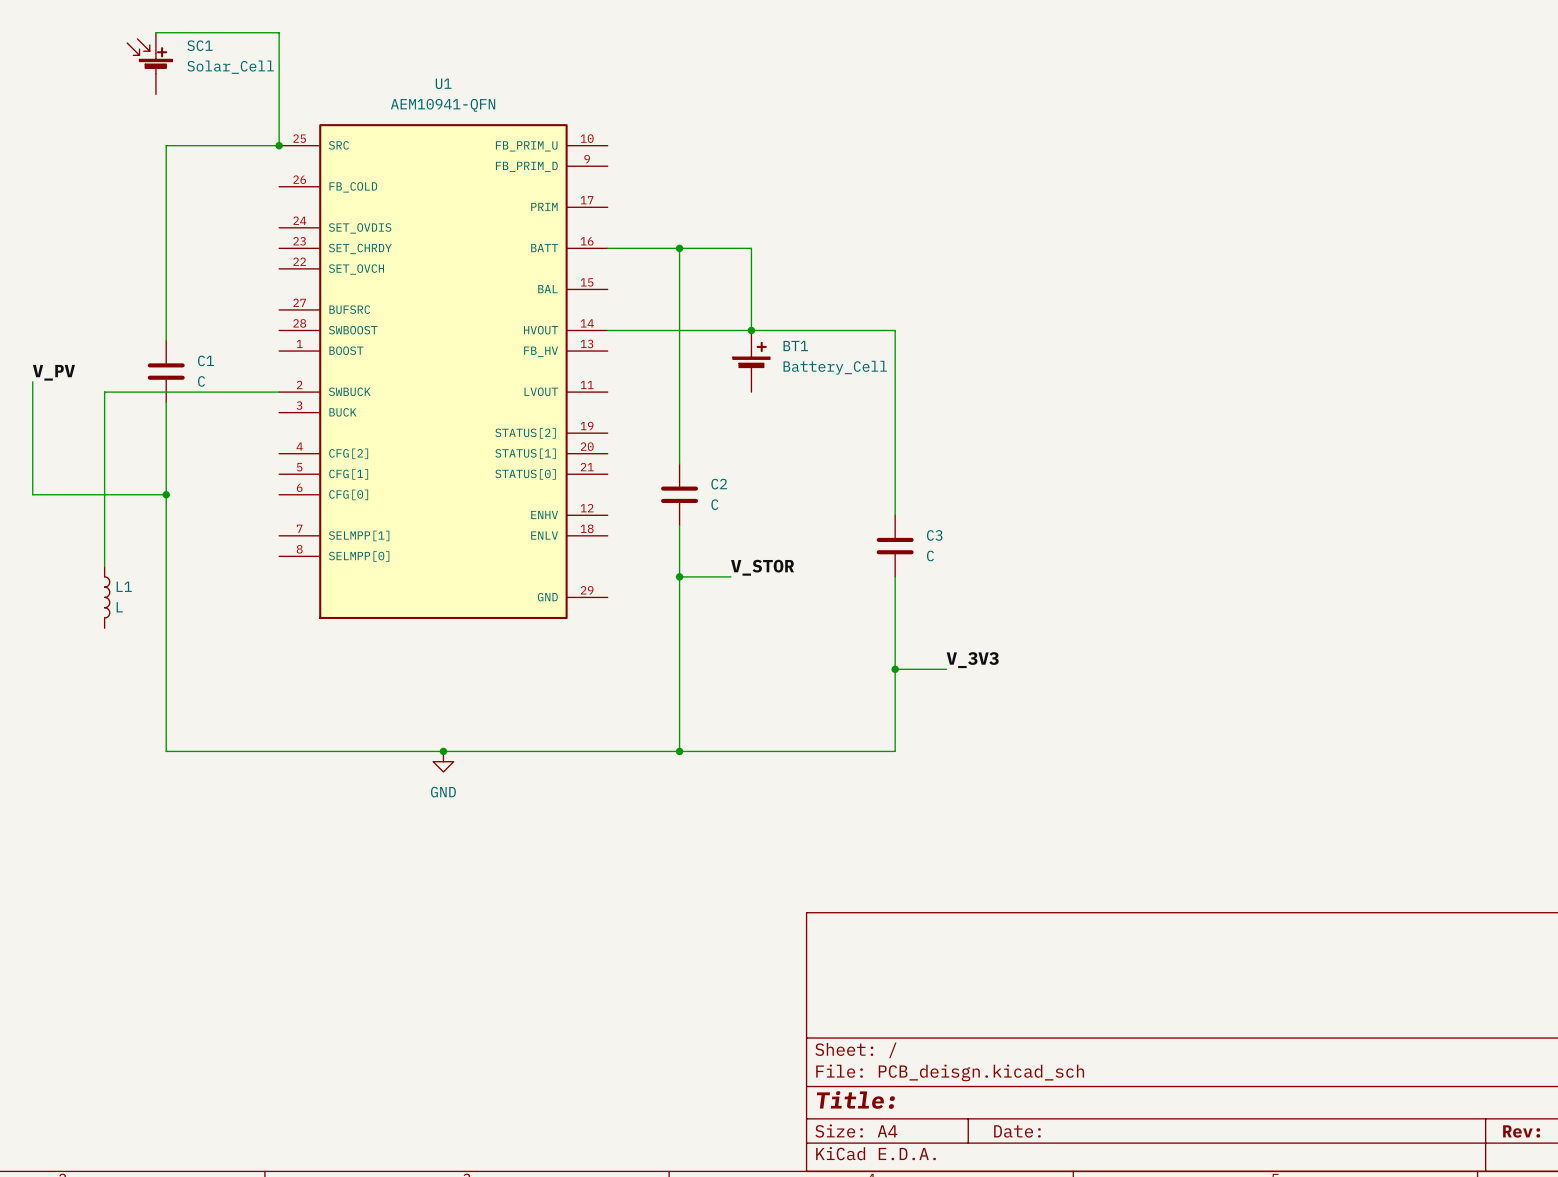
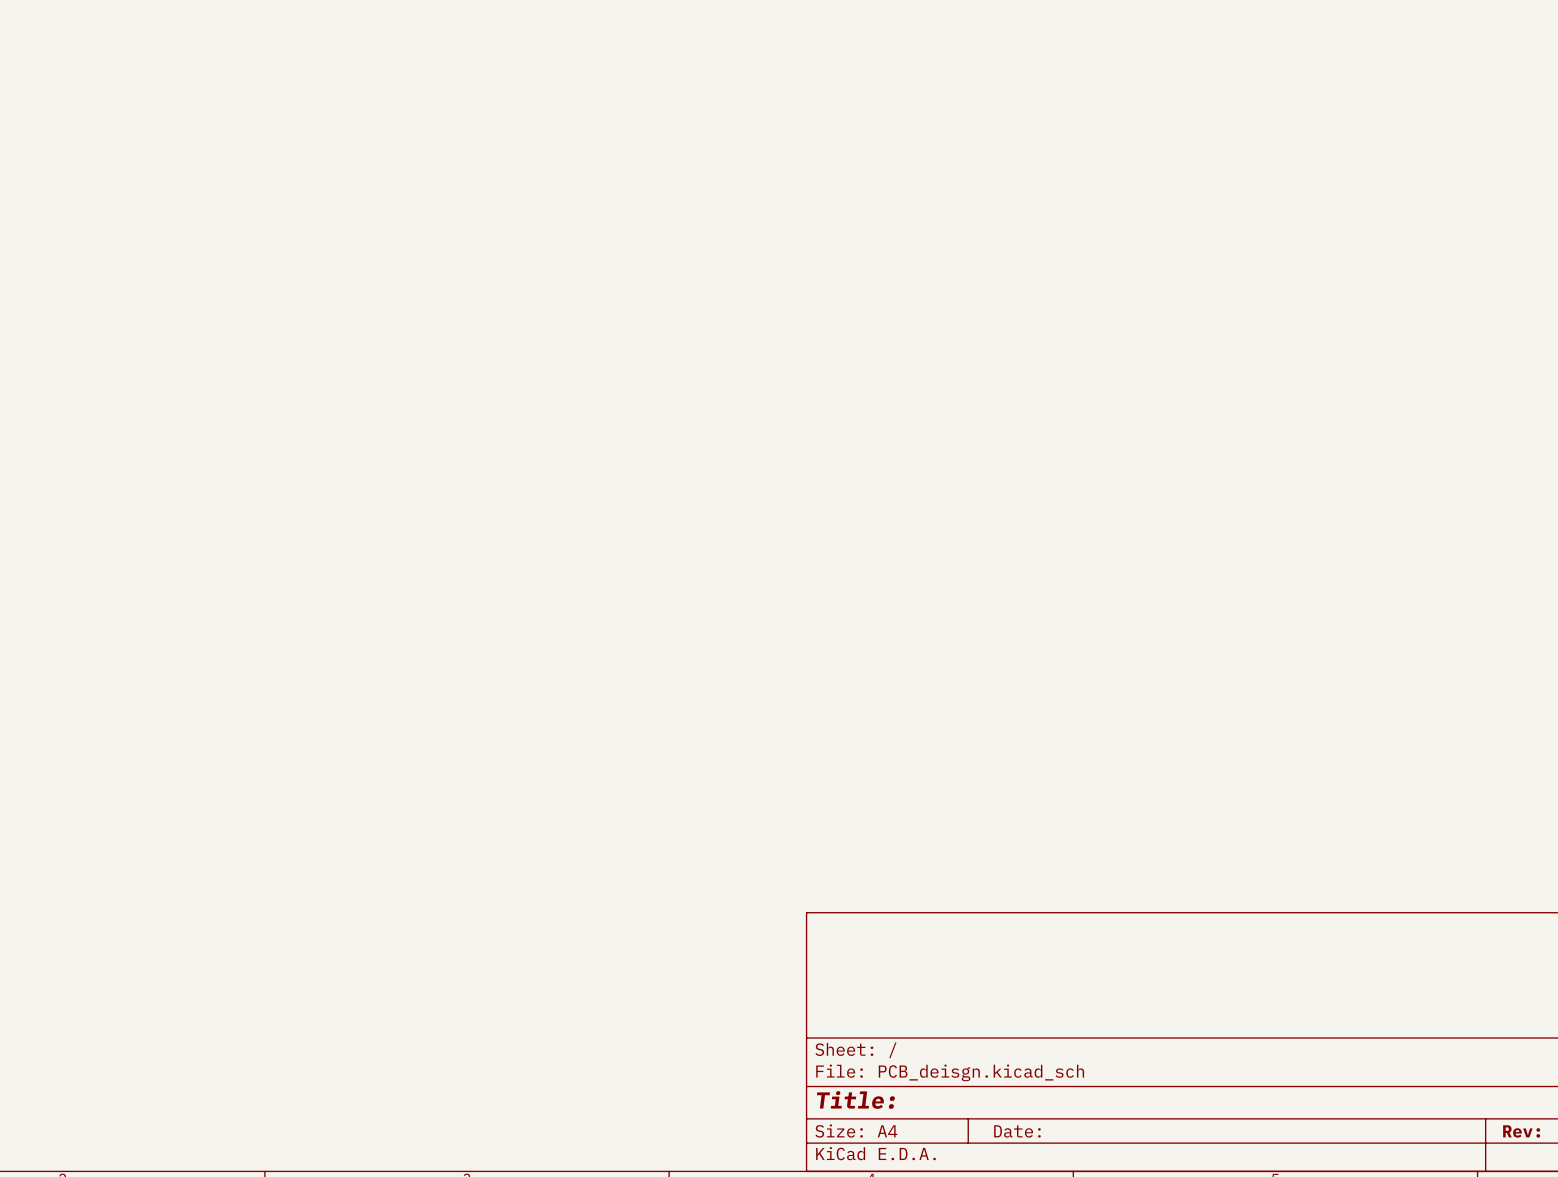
wire: (155, 32) (279, 32) (279, 145) (166, 145) (166, 340) -> none
SC1: Solar_Cell (149, 63) -> none
junction: (279, 145) -> none
wire: (607, 248) (751, 248) (751, 330) -> none
wire: (679, 248) (679, 463) -> none
junction: (679, 248) -> none
wire: (607, 330) (895, 330) (895, 515) -> none
junction: (751, 330) -> none
BT1: Battery_Cell (751, 361) -> none
C1: C (166, 371) -> none
U1: AEM10941-QFN (443, 371) -> none
label: V_PV (53, 372) -> none
wire: (32, 381) (32, 494) (166, 494) -> none
wire: (279, 392) (104, 392) (104, 566) -> none
wire: (166, 402) (166, 751) (895, 751) (895, 576) -> none
junction: (166, 494) -> none
C2: C (679, 494) -> none
wire: (679, 525) (679, 751) -> none
C3: C (895, 546) -> none
label: V_STOR (762, 567) -> none
wire: (679, 576) (730, 576) -> none
junction: (679, 576) -> none
L1: L (107, 597) -> none
label: V_3V3 (972, 660) -> none
wire: (895, 669) (946, 669) -> none
junction: (895, 669) -> none
junction: (443, 751) -> none
junction: (679, 751) -> none
power symbol: GND (443, 761) -> none

